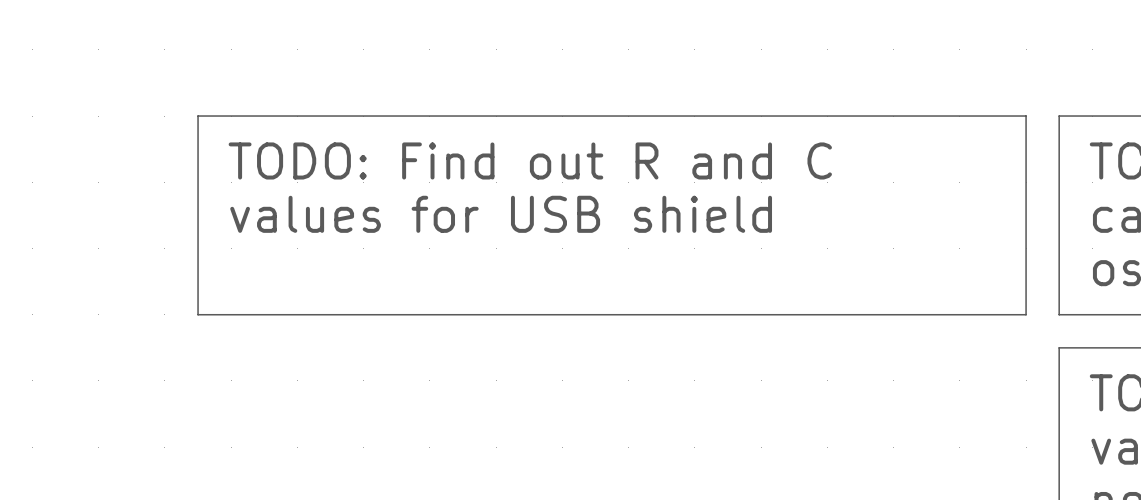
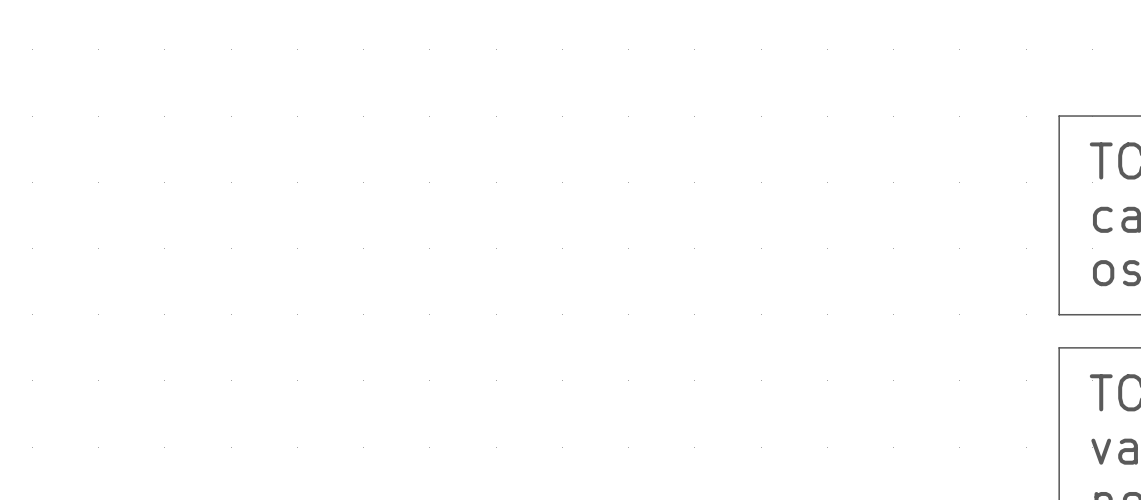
line: (198, 116) (1026, 116) (1026, 314) (198, 314) (198, 116) -> none
text: TODO: Find out R and C (530, 160) -> none
text: values for USB shield (501, 214) -> none

